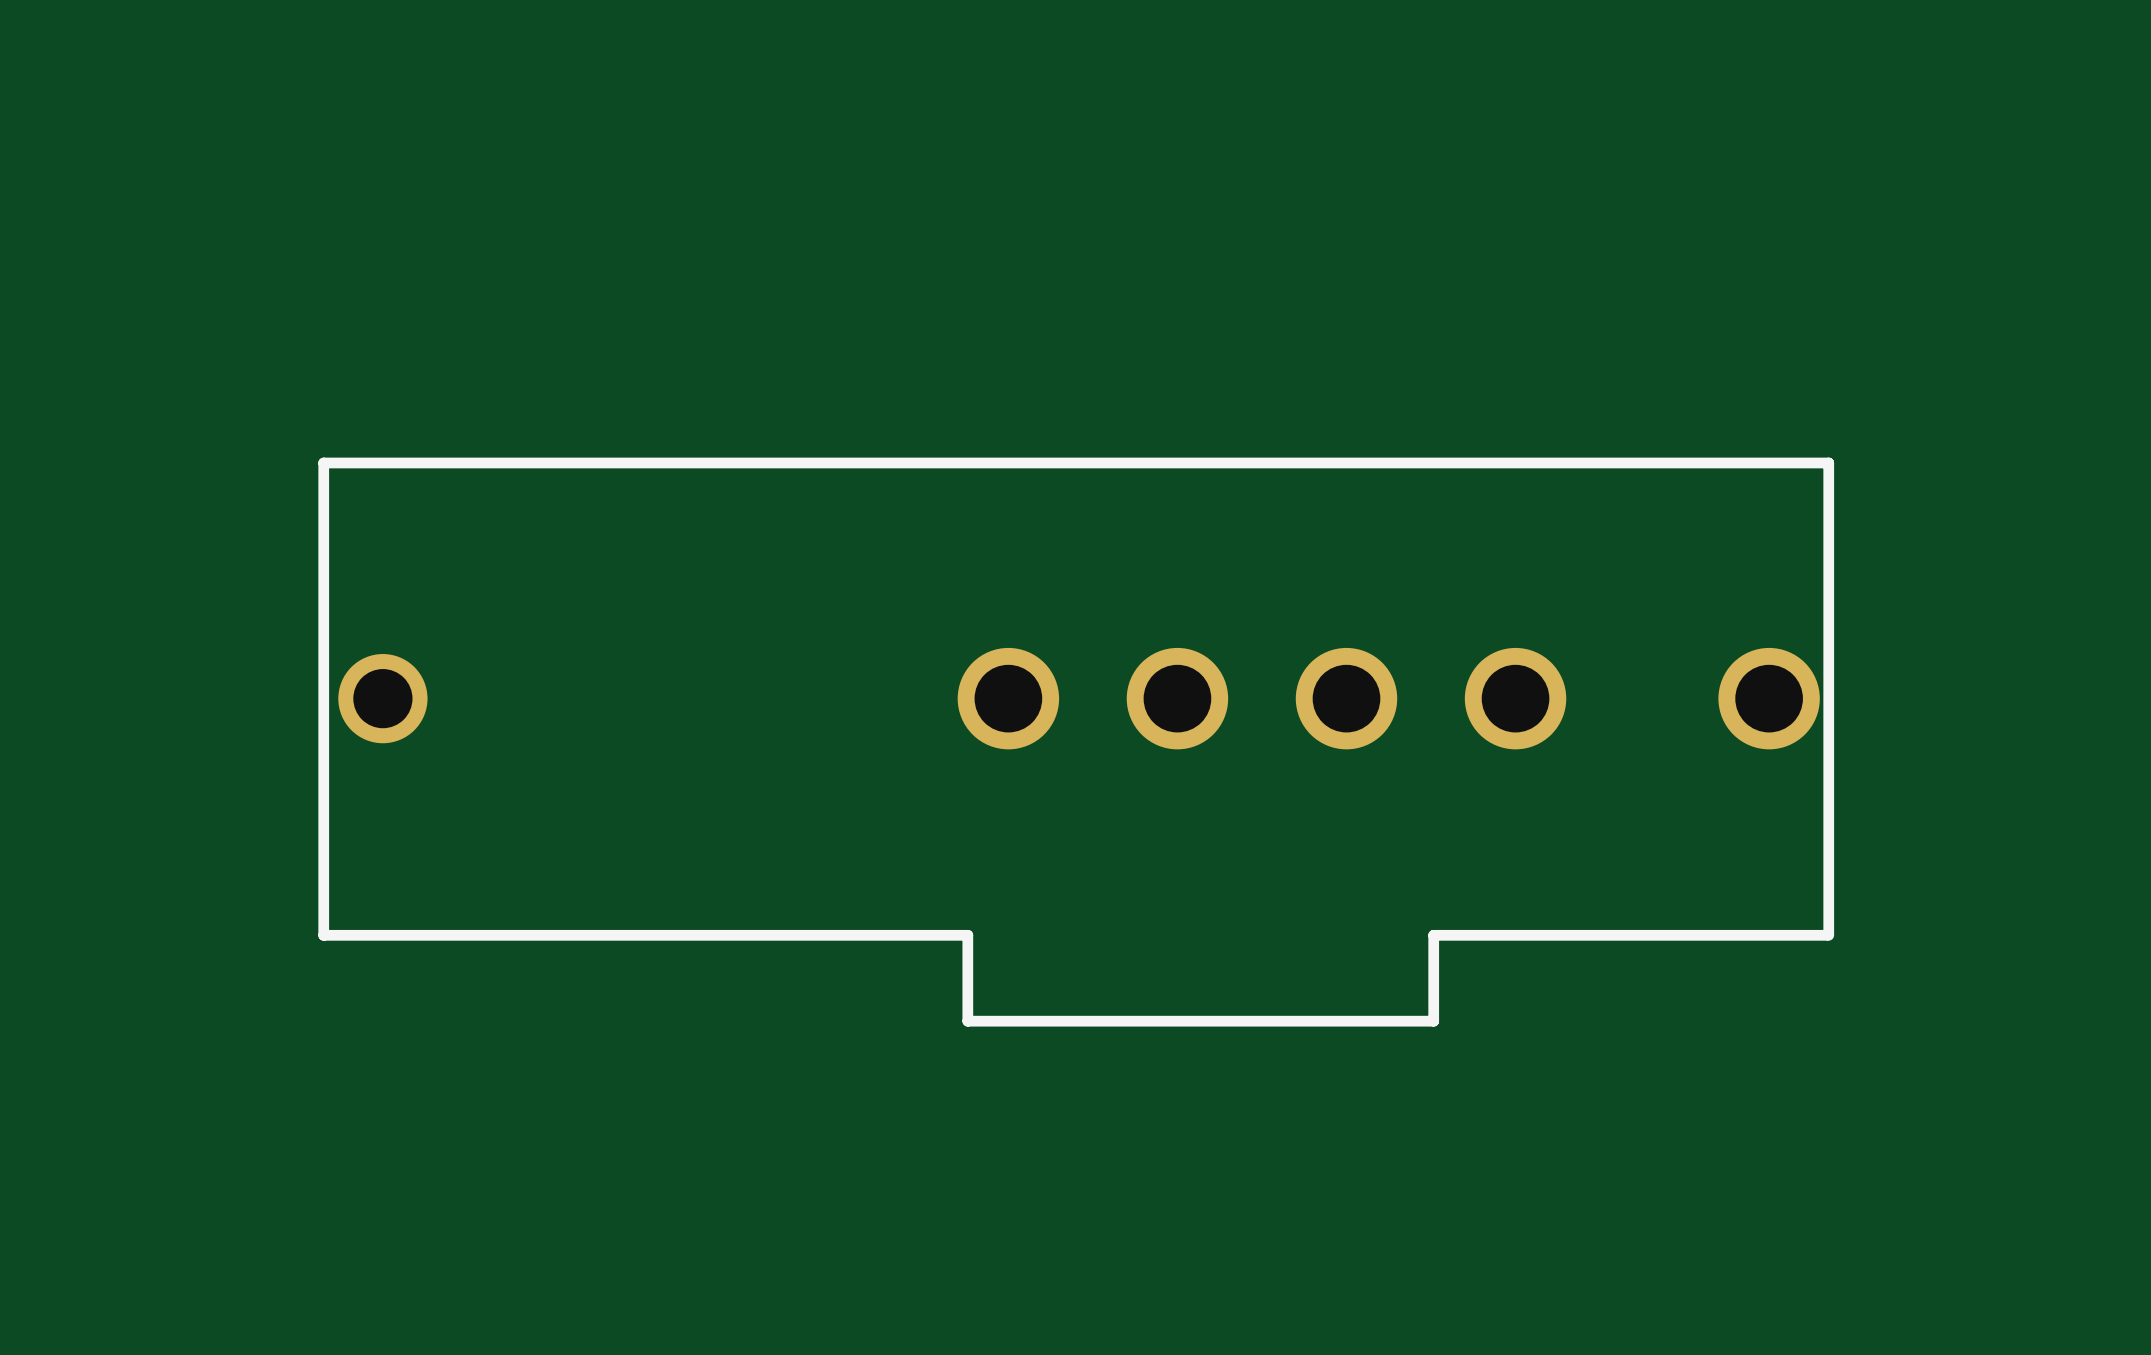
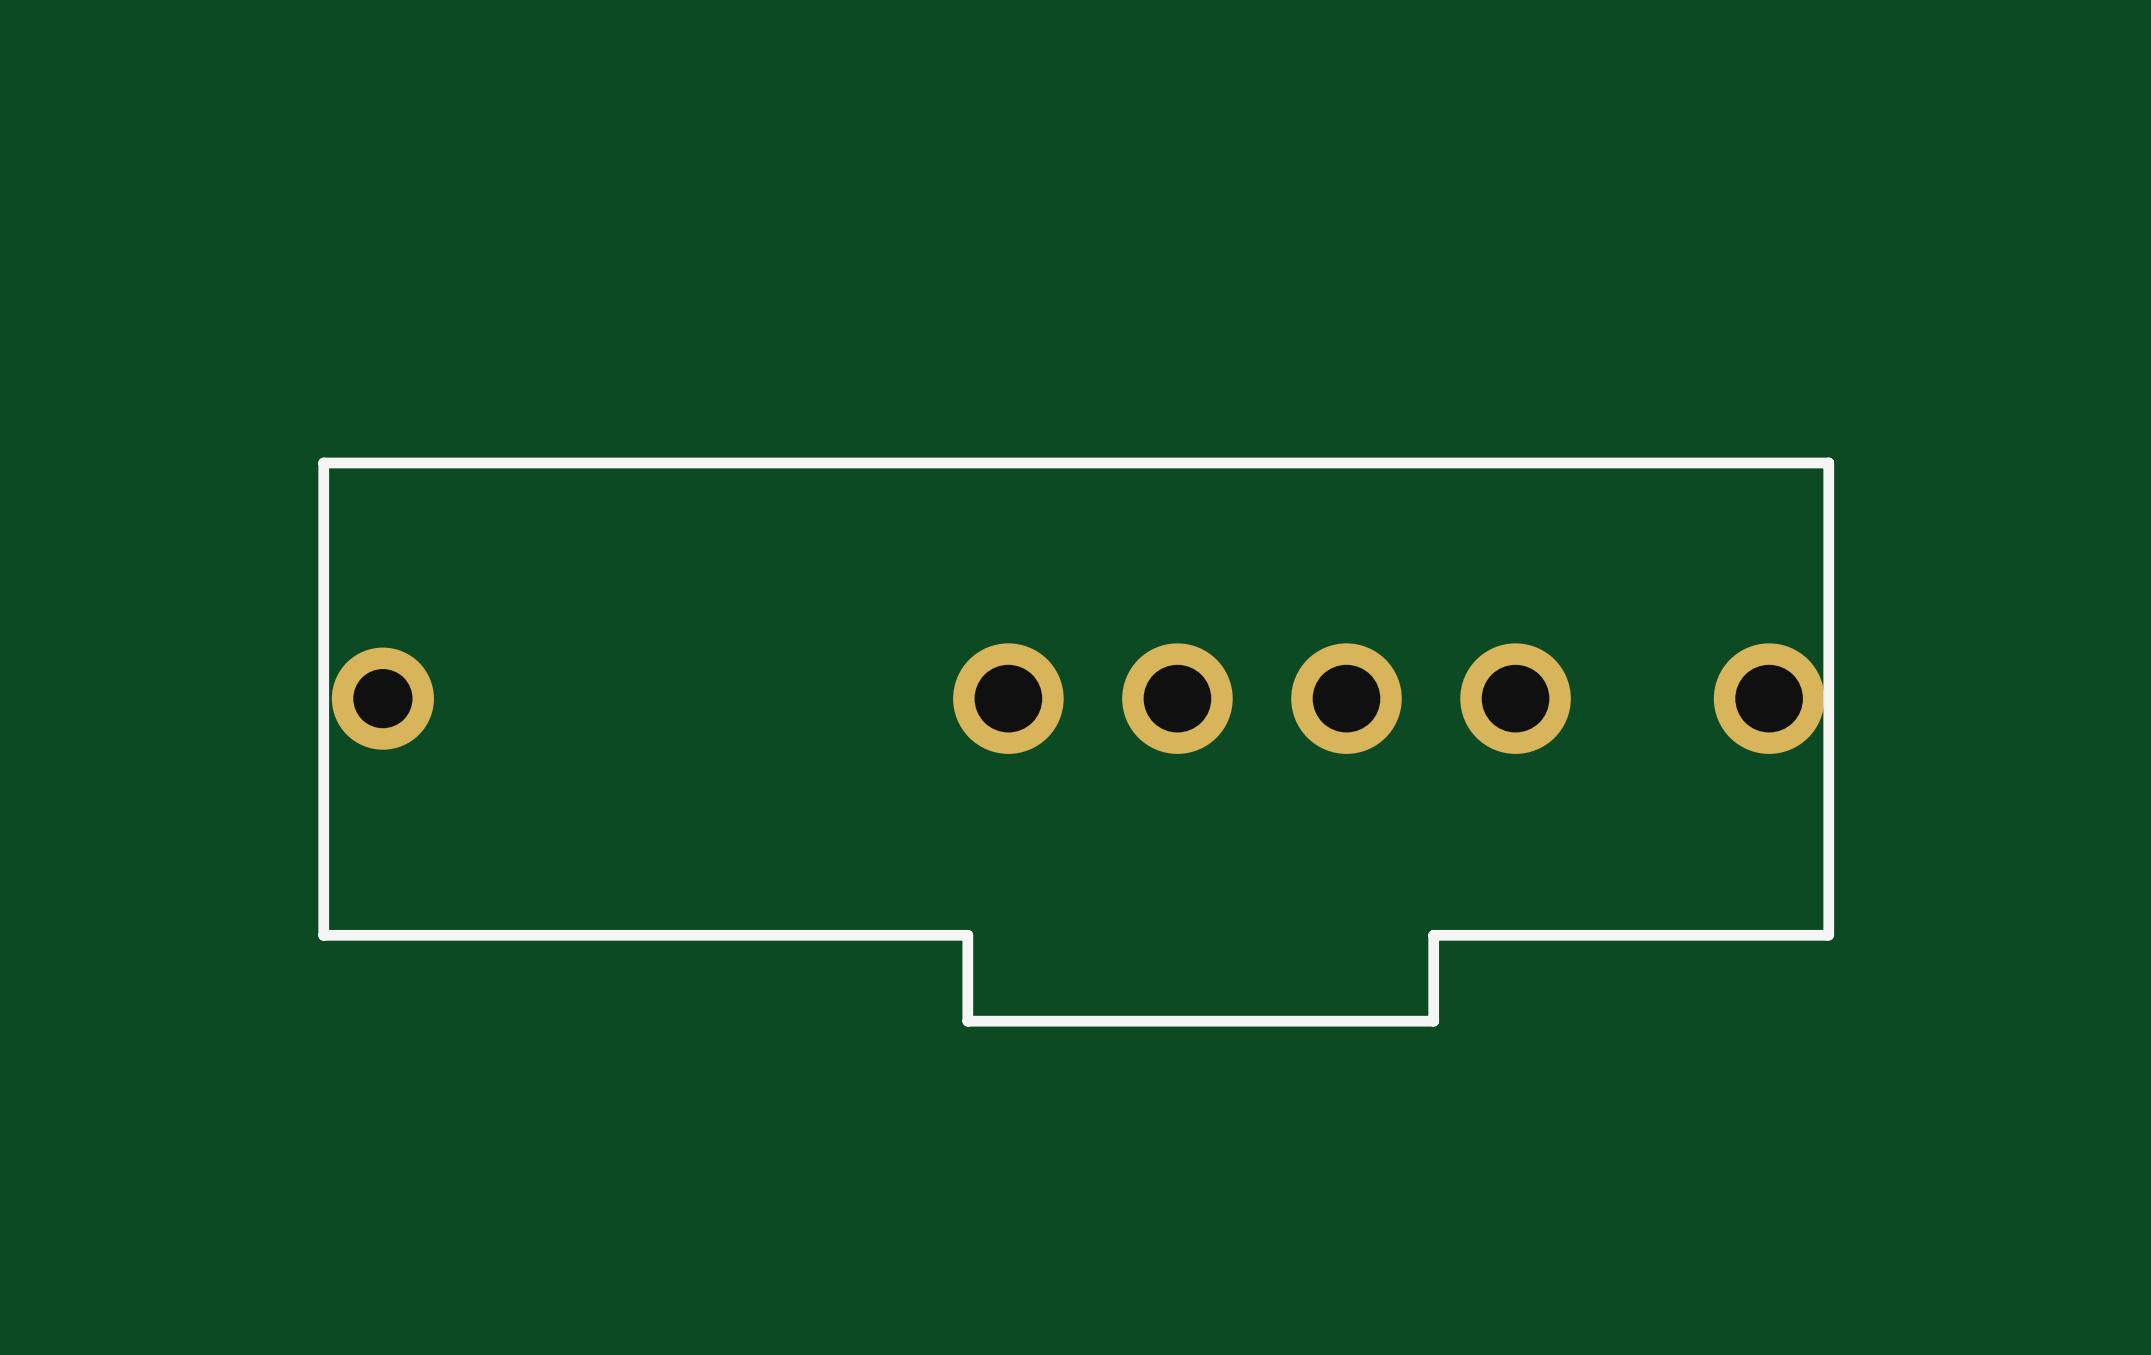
part footprint: [318, 457, 1835, 1027] -> [318, 457, 1835, 1027]

